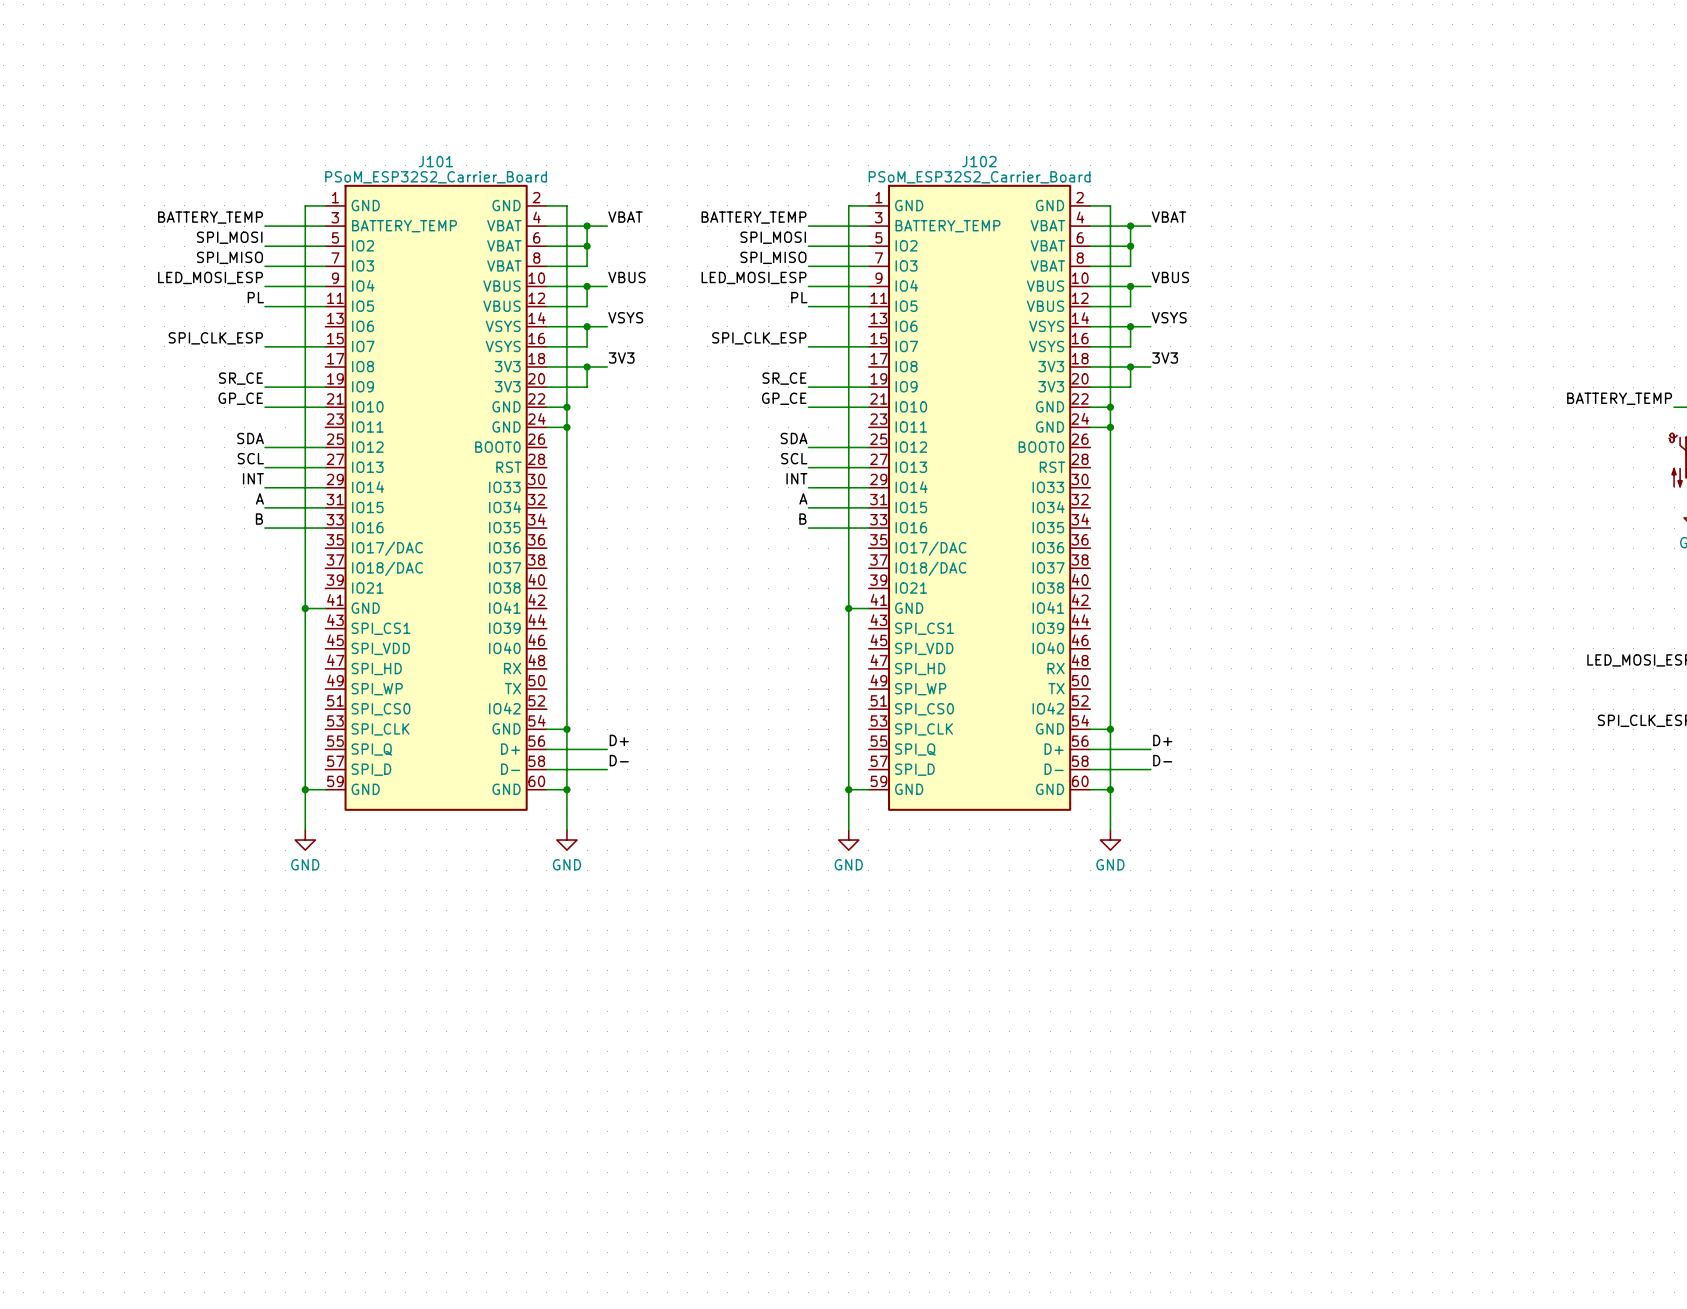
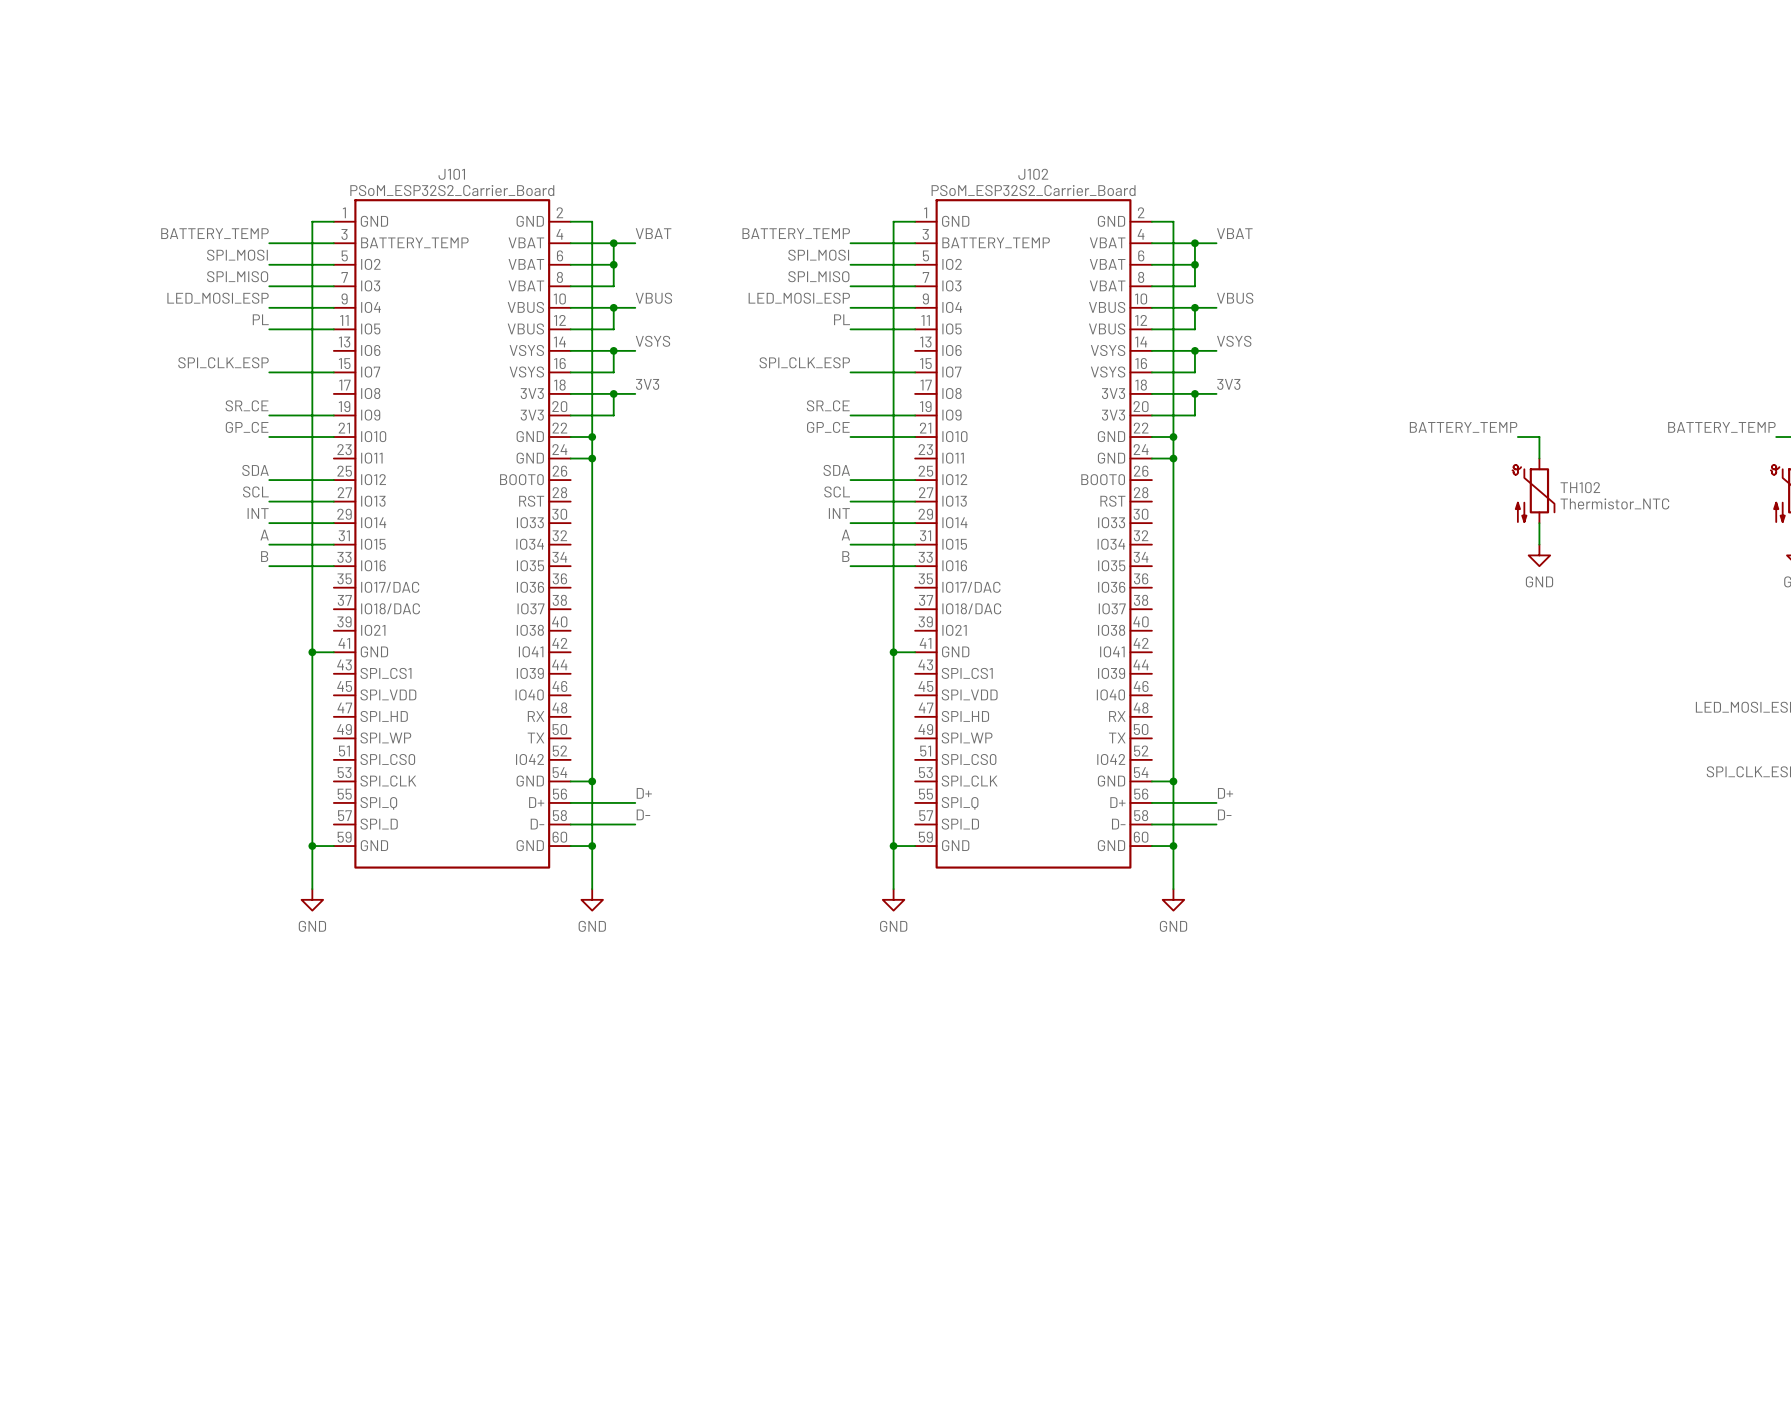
label: none -> BATTERY_TEMP (1463, 427)
wire: none -> (1517, 437) (1539, 437) (1539, 458)
TH102: none -> Thermistor_NTC (1533, 490)
wire: none -> (1539, 523) (1539, 544)
power symbol: none -> GND (1539, 555)

